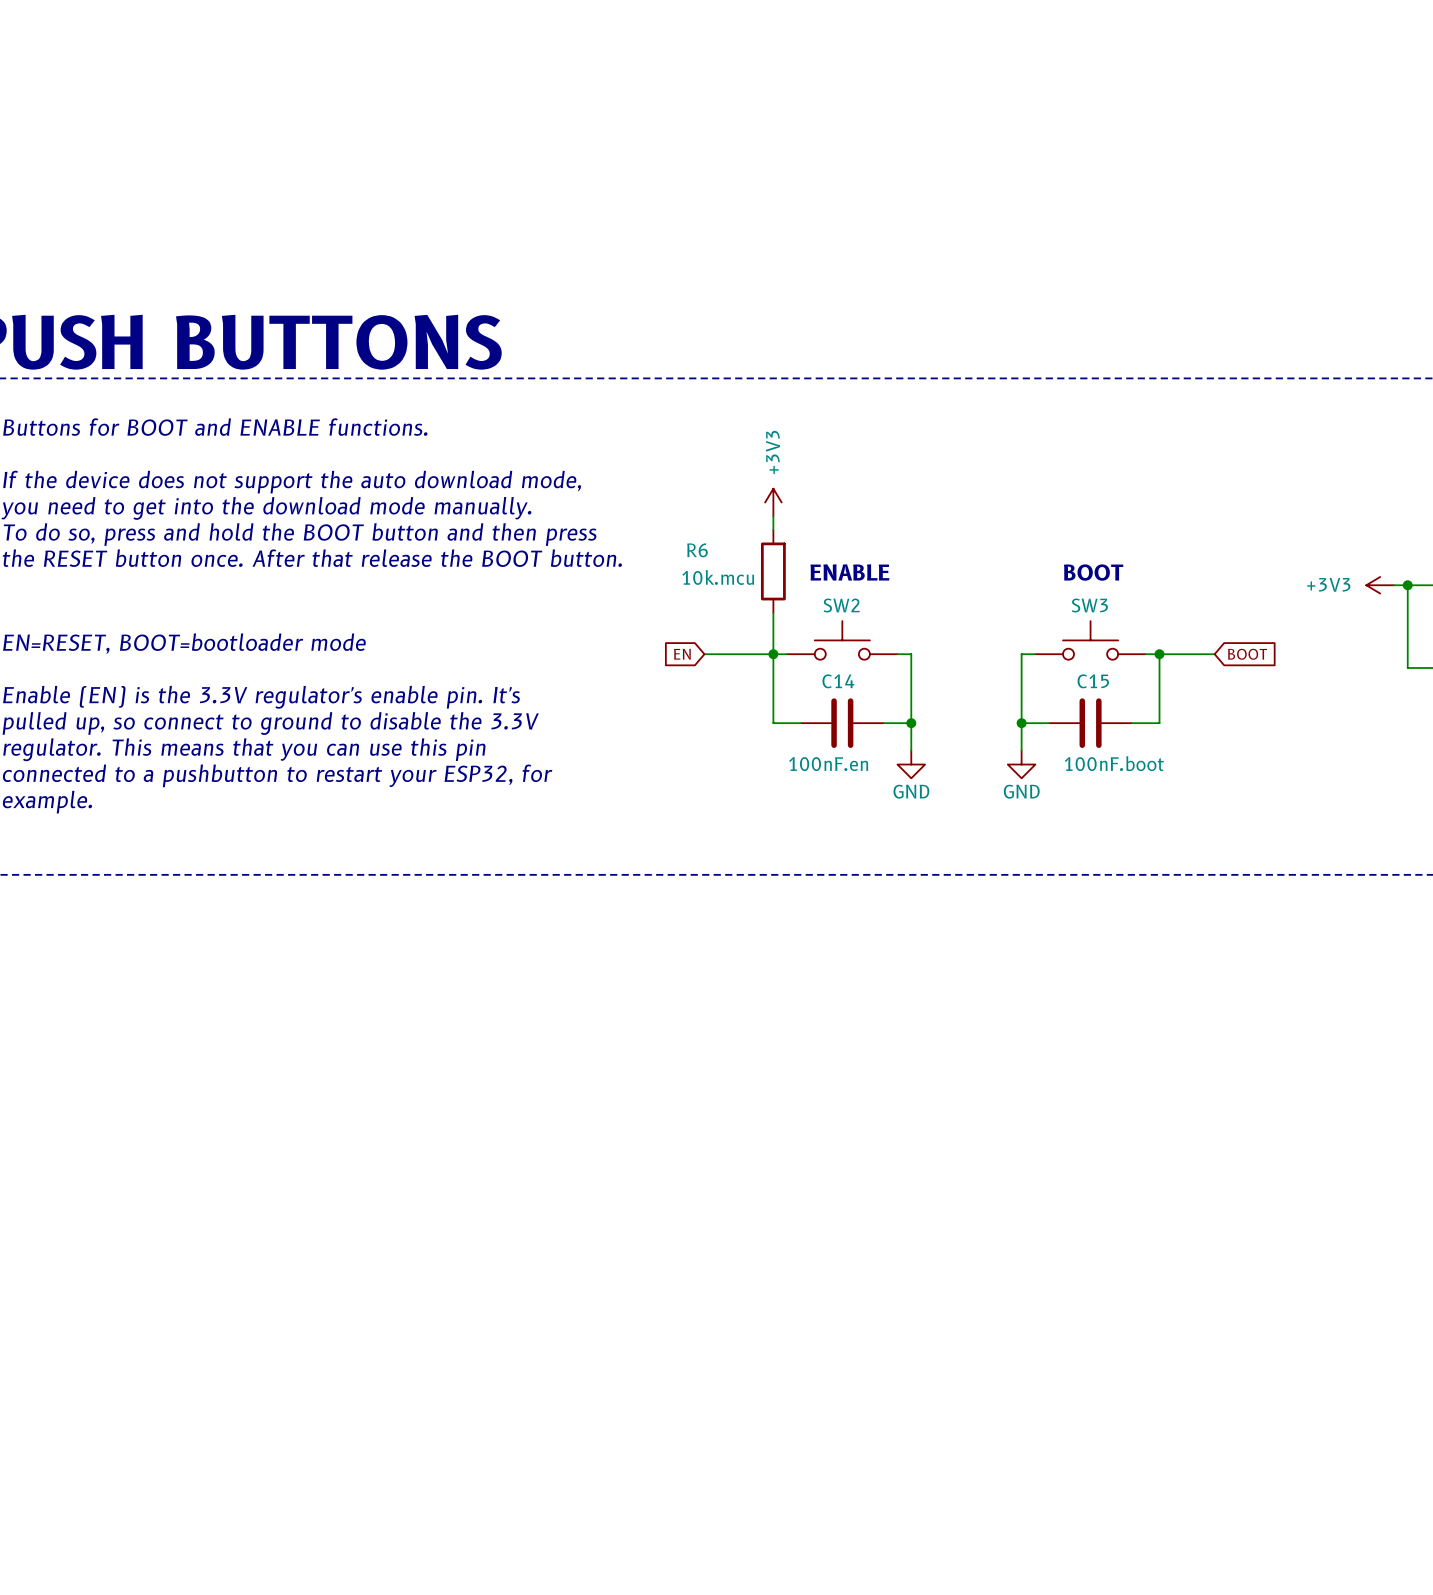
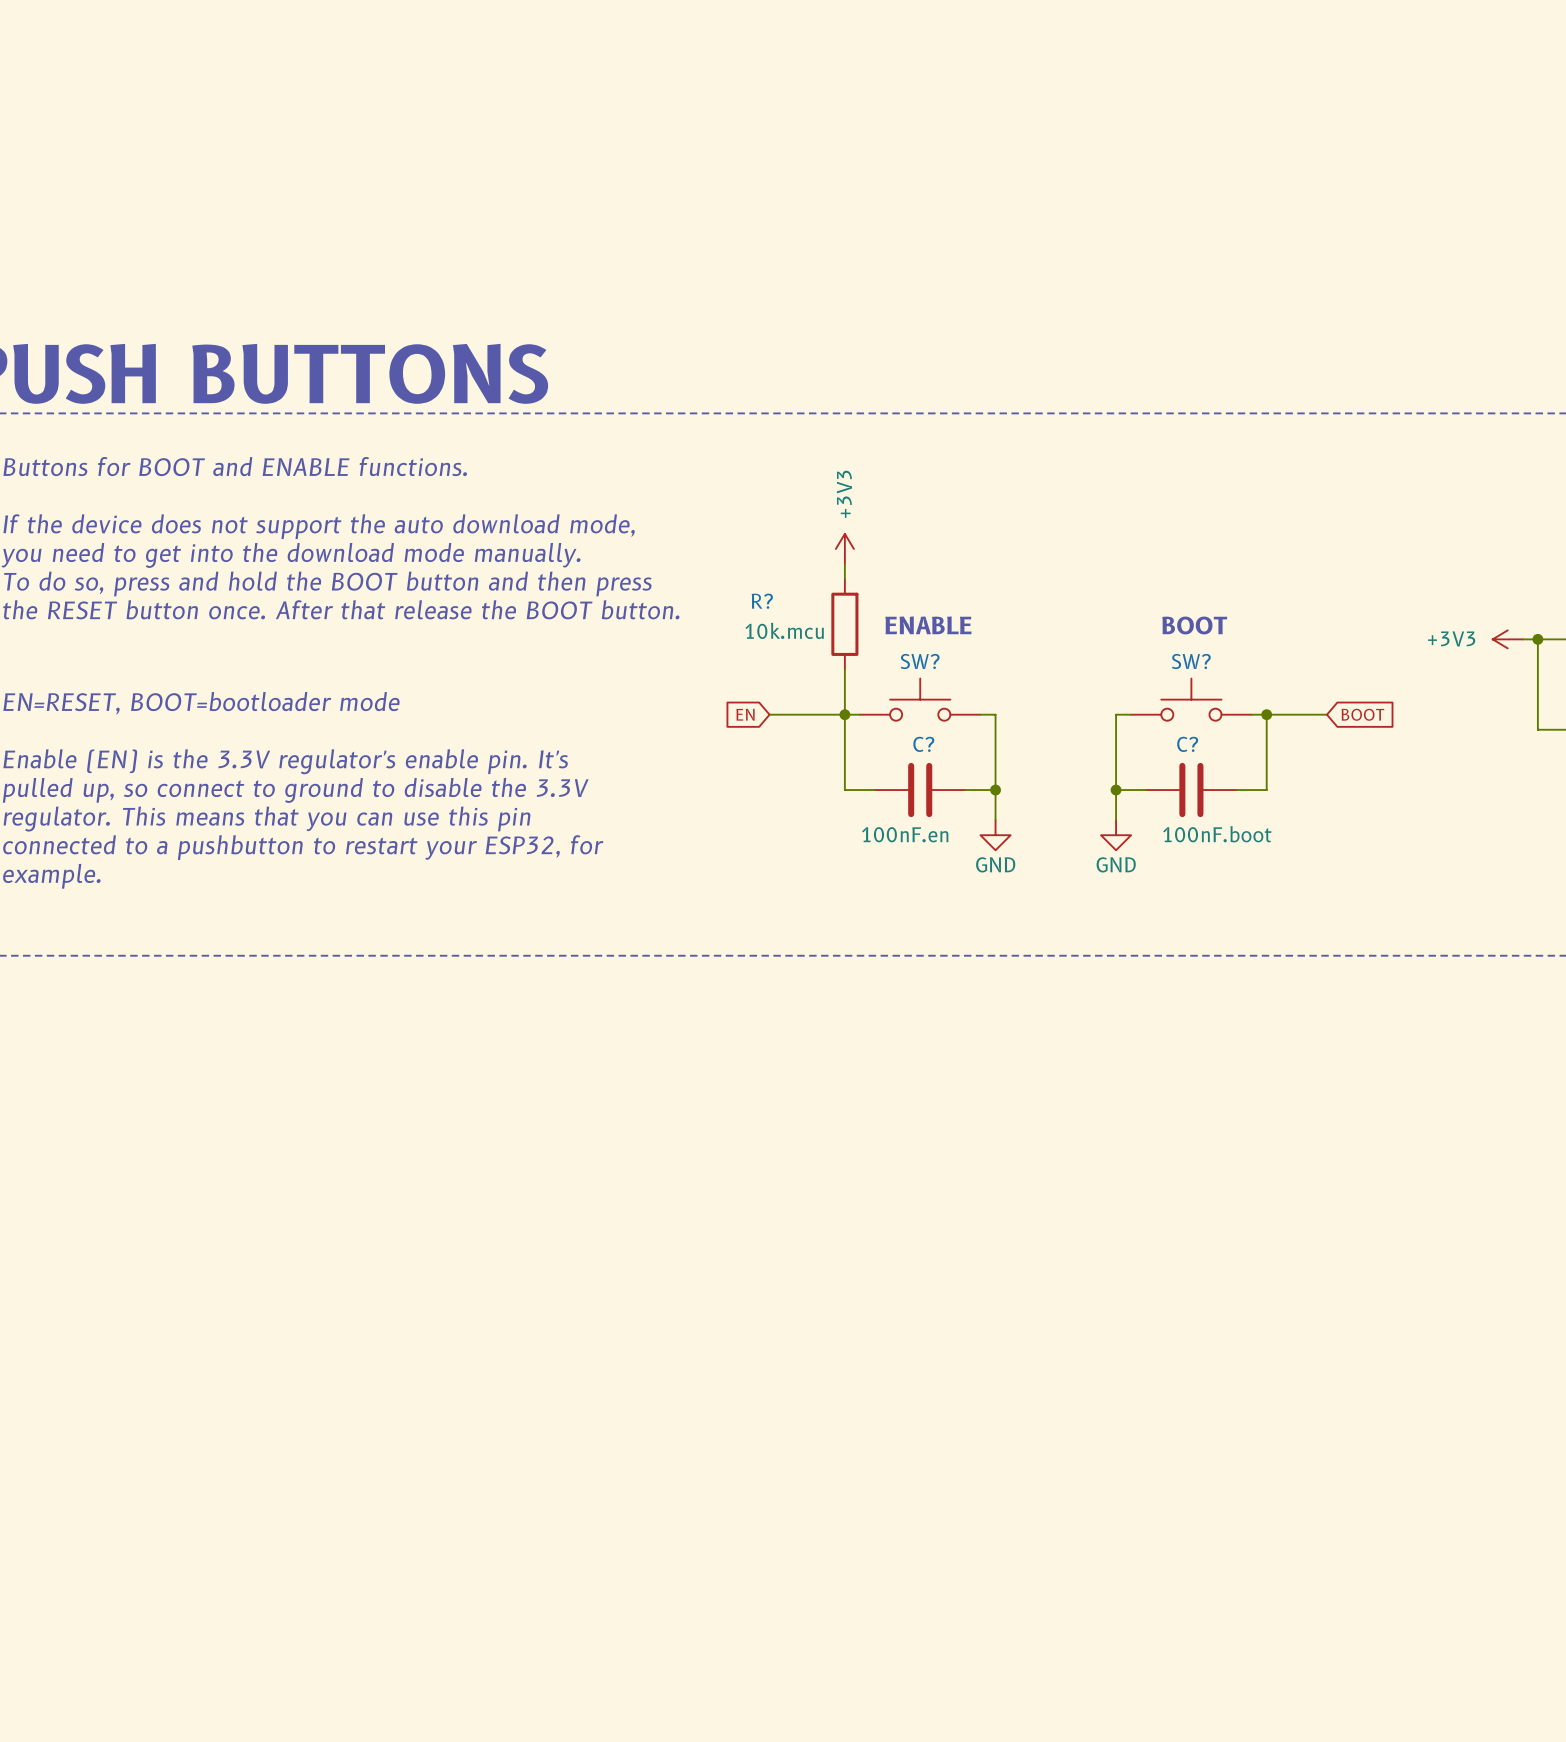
R6 name: R6 (697, 550) -> R? (762, 601)
SW2 name: SW2 (841, 605) -> SW? (920, 661)
SW3 name: SW3 (1089, 605) -> SW? (1191, 661)
C14 name: C14 (838, 681) -> C? (923, 744)
C15 name: C15 (1093, 681) -> C? (1187, 744)

